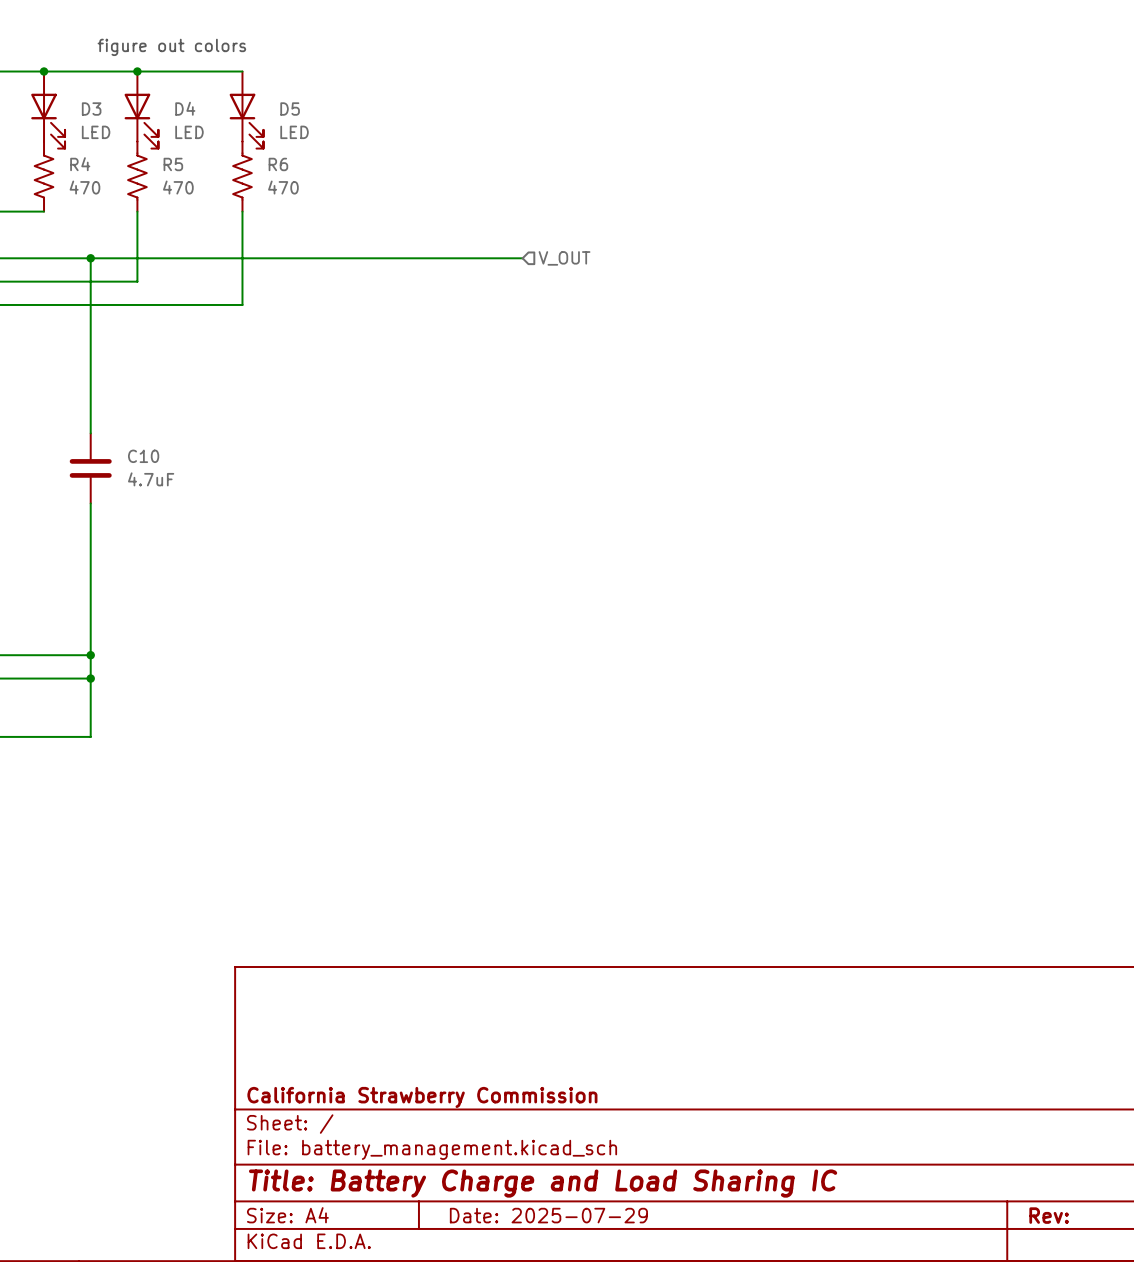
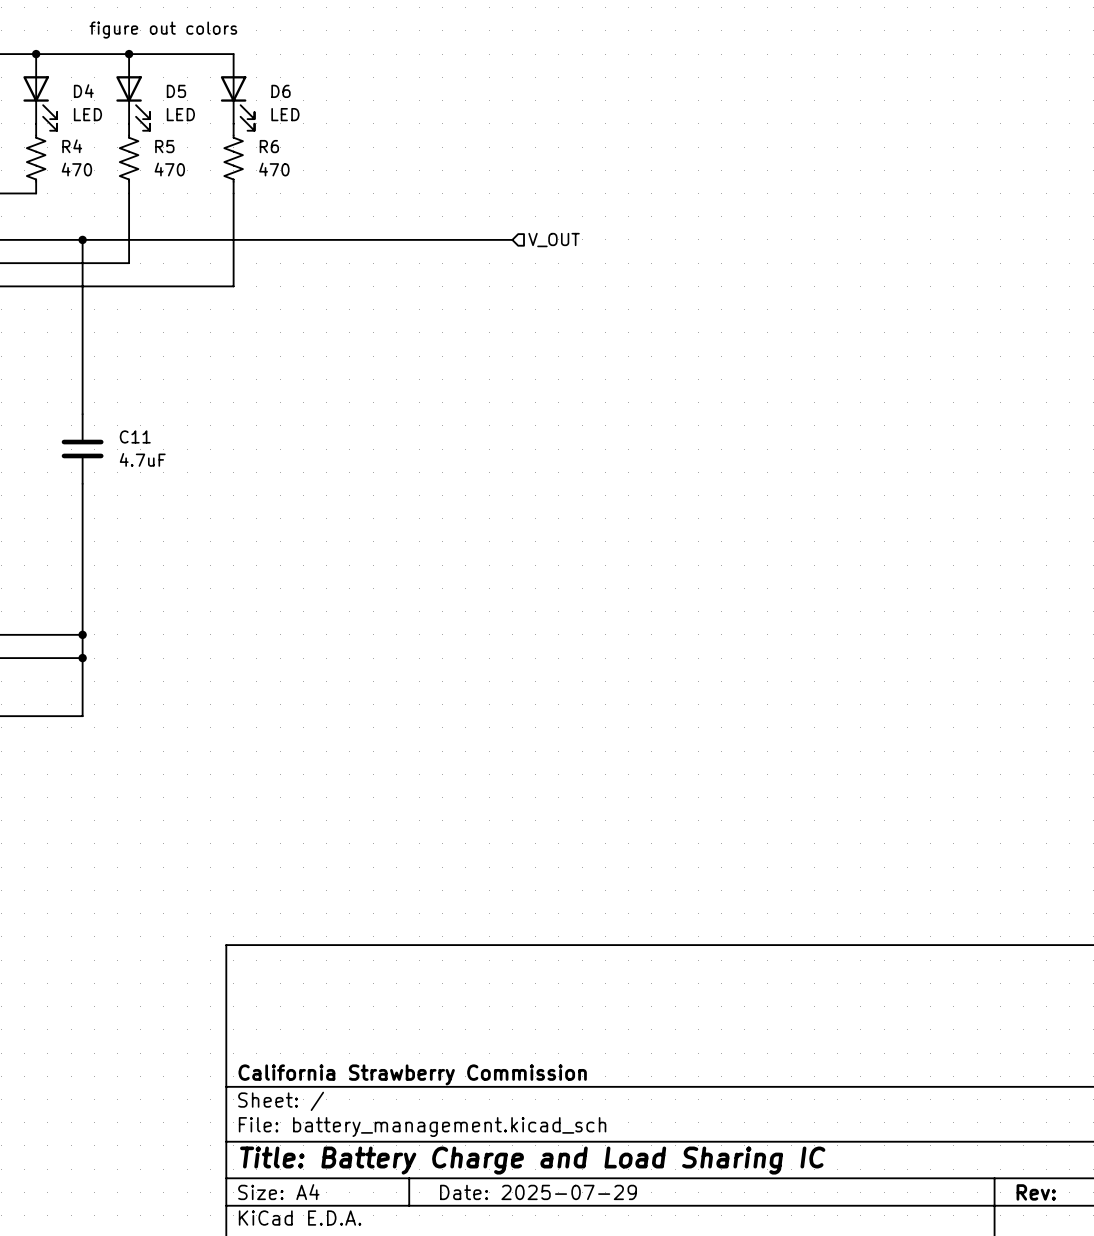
D4 name: D4 (185, 108) -> D5 (176, 91)
D3 name: D3 (91, 109) -> D4 (83, 91)
D5 name: D5 (290, 109) -> D6 (281, 91)
C10 name: C10 (143, 456) -> C11 (135, 436)

